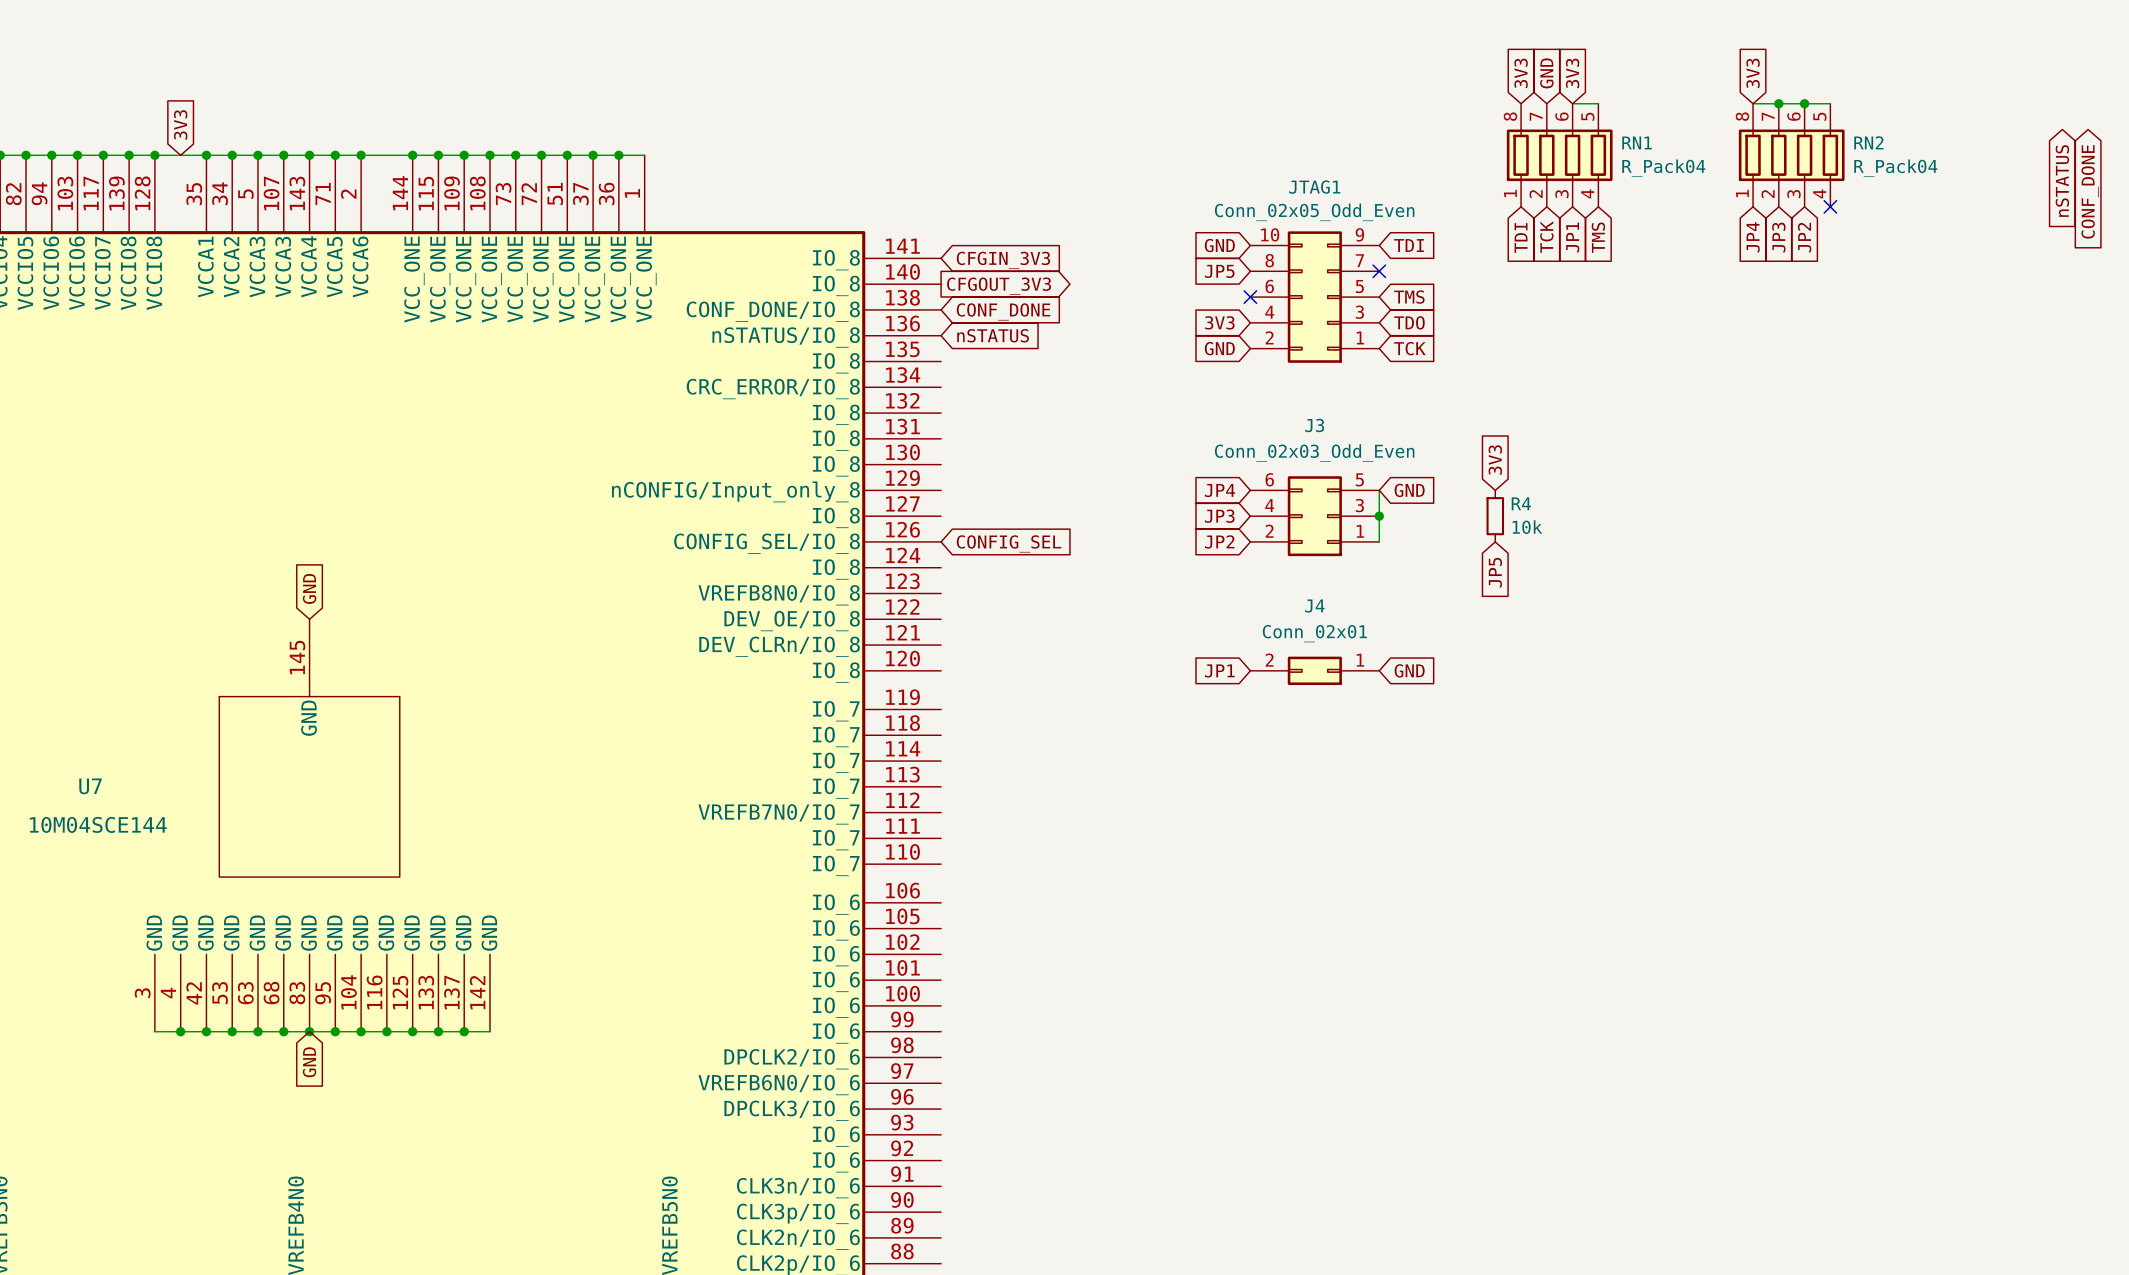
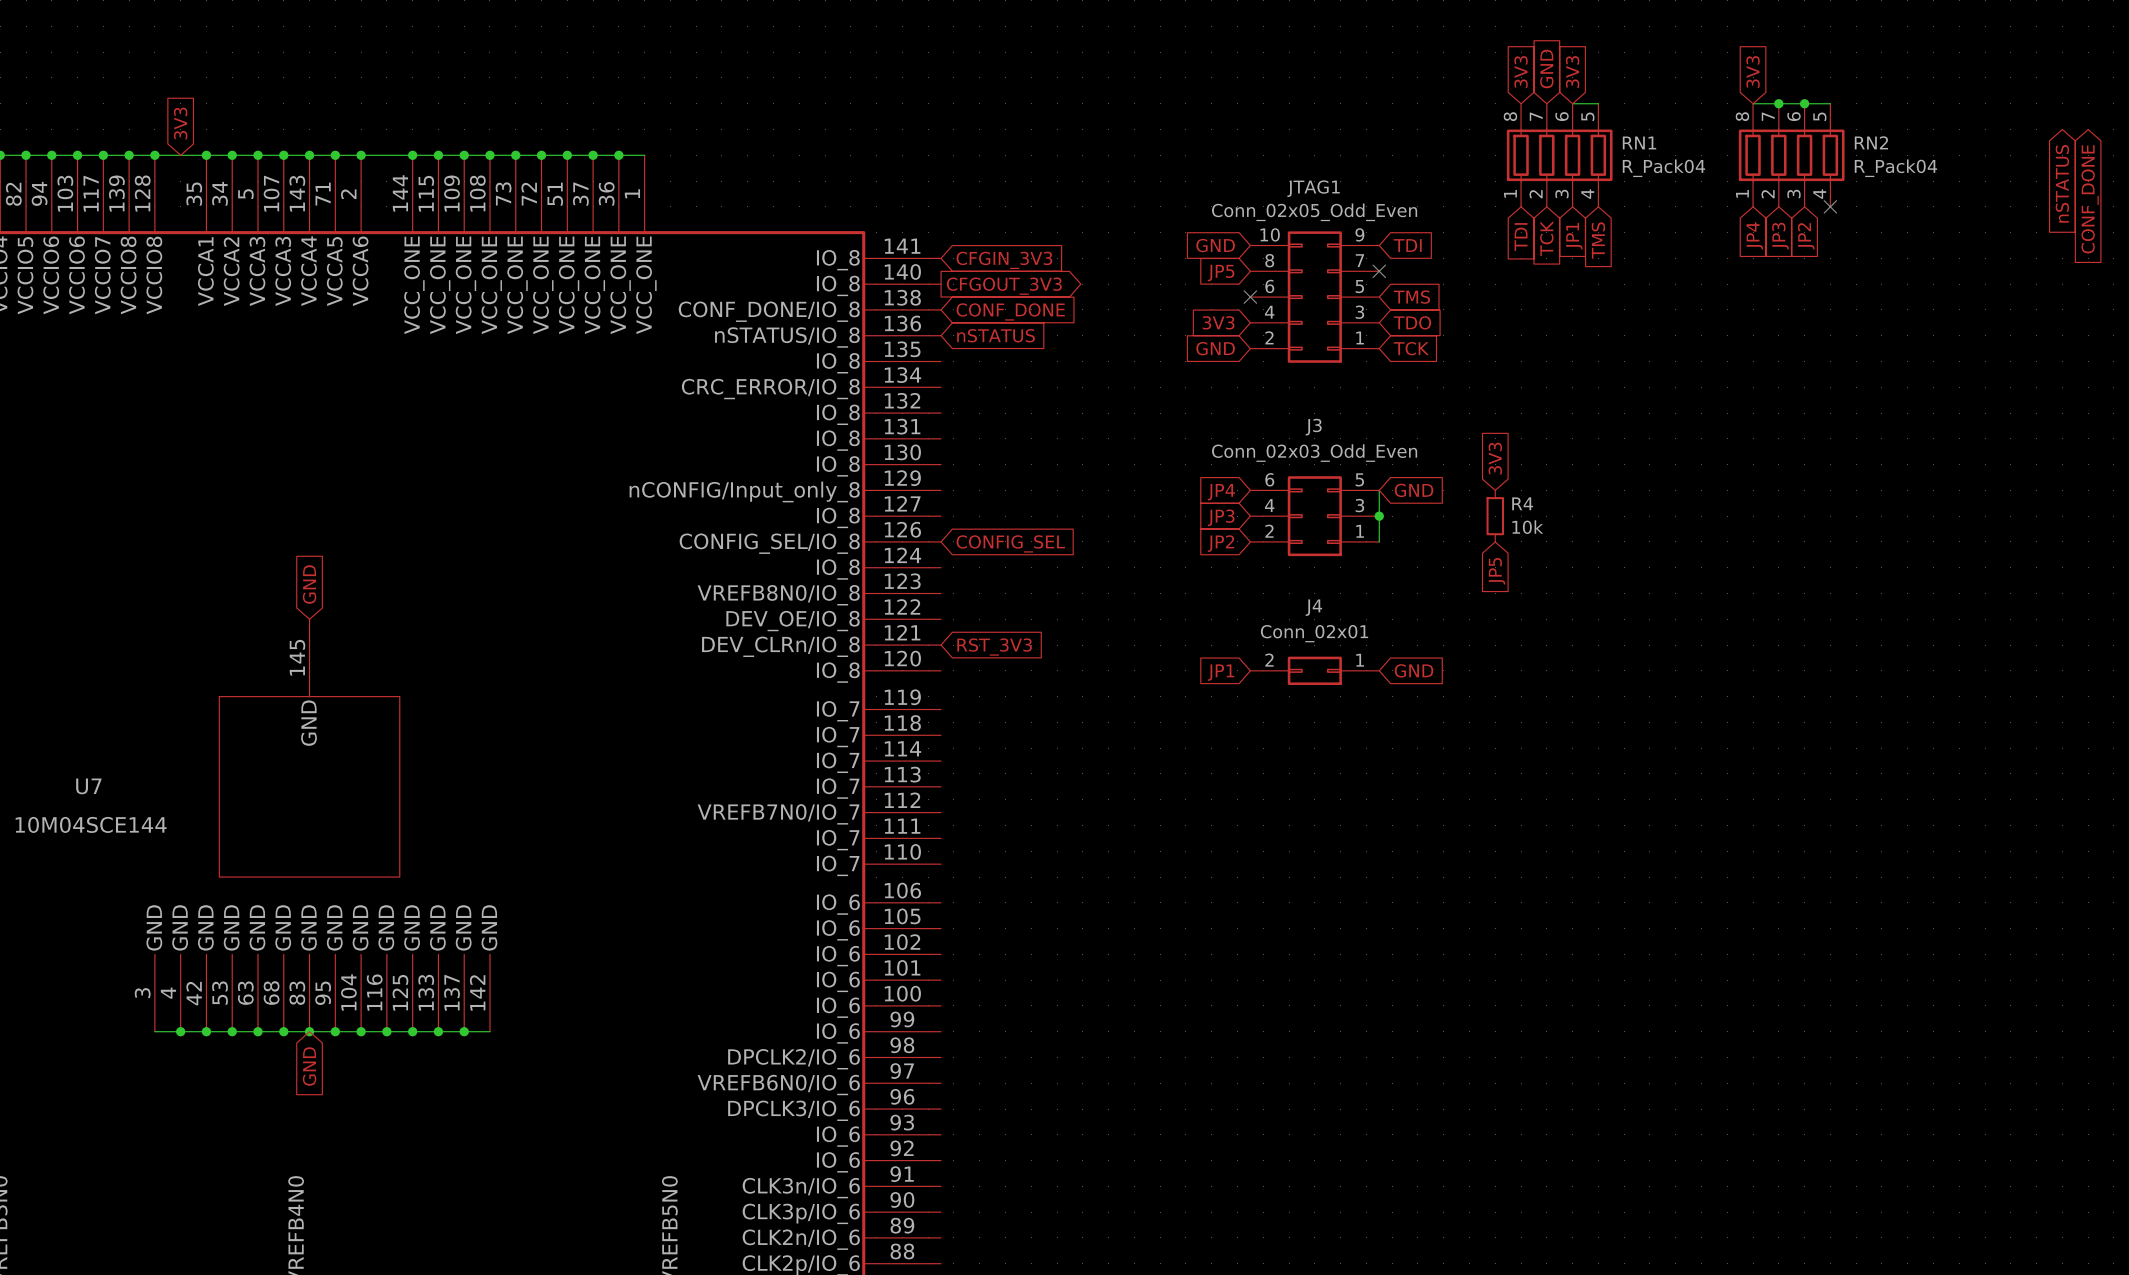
global label: none -> RST_3V3 (994, 647)

